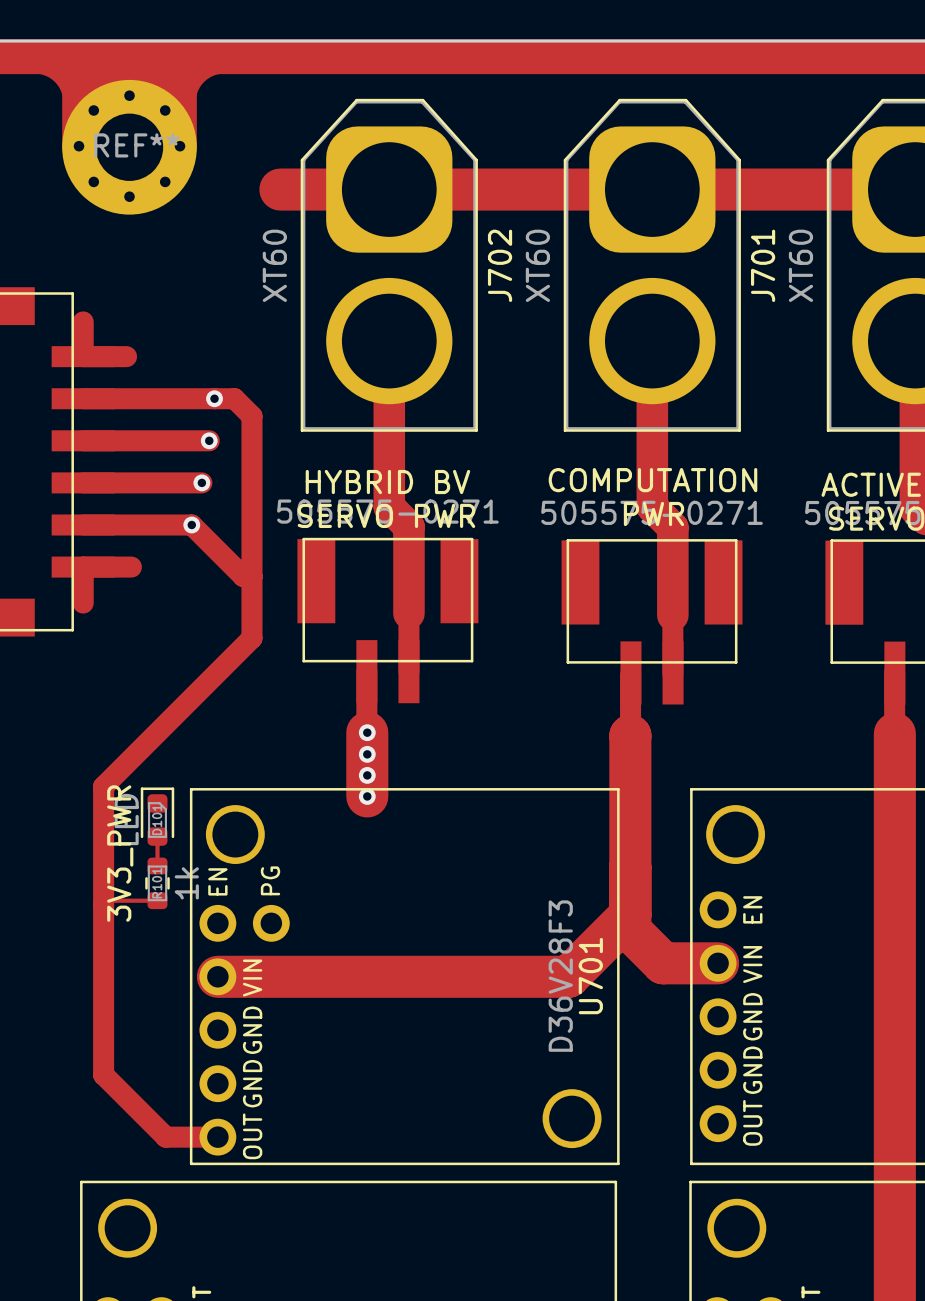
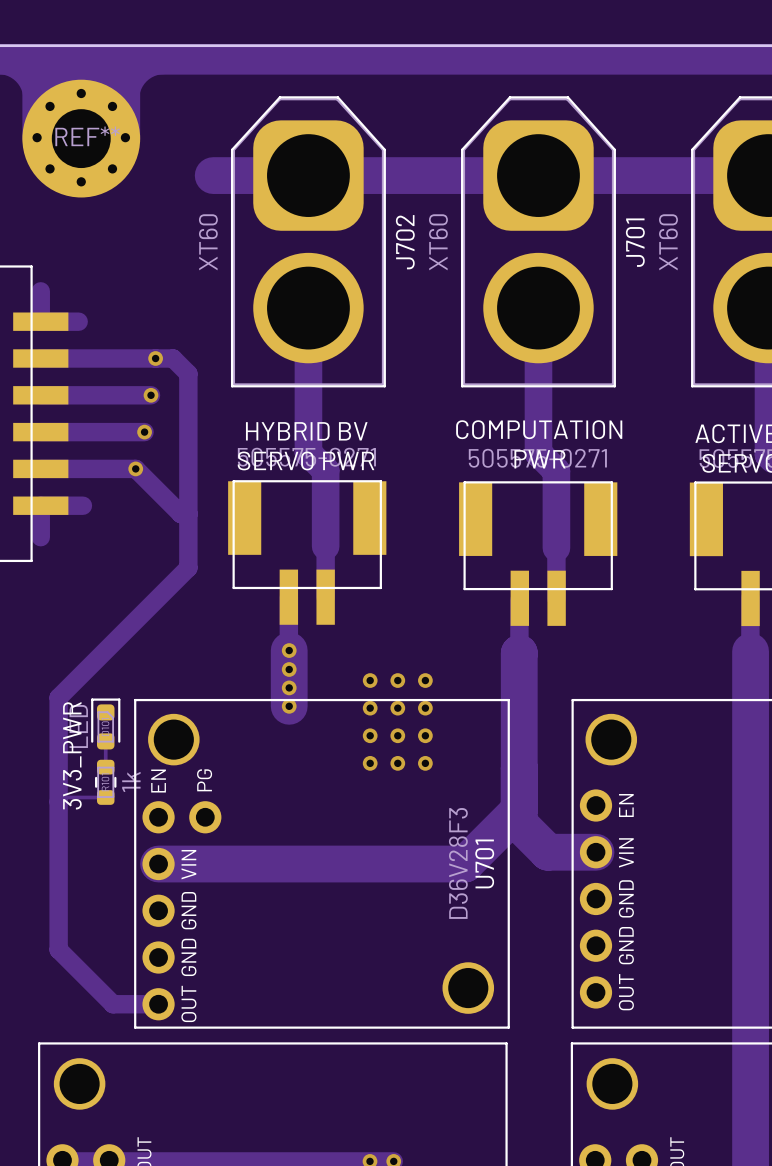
via: none -> (370, 680)
via: none -> (397, 680)
via: none -> (425, 680)
via: none -> (370, 708)
via: none -> (397, 708)
via: none -> (425, 708)
via: none -> (370, 735)
via: none -> (397, 735)
via: none -> (425, 735)
via: none -> (370, 763)
via: none -> (397, 763)
via: none -> (425, 763)

